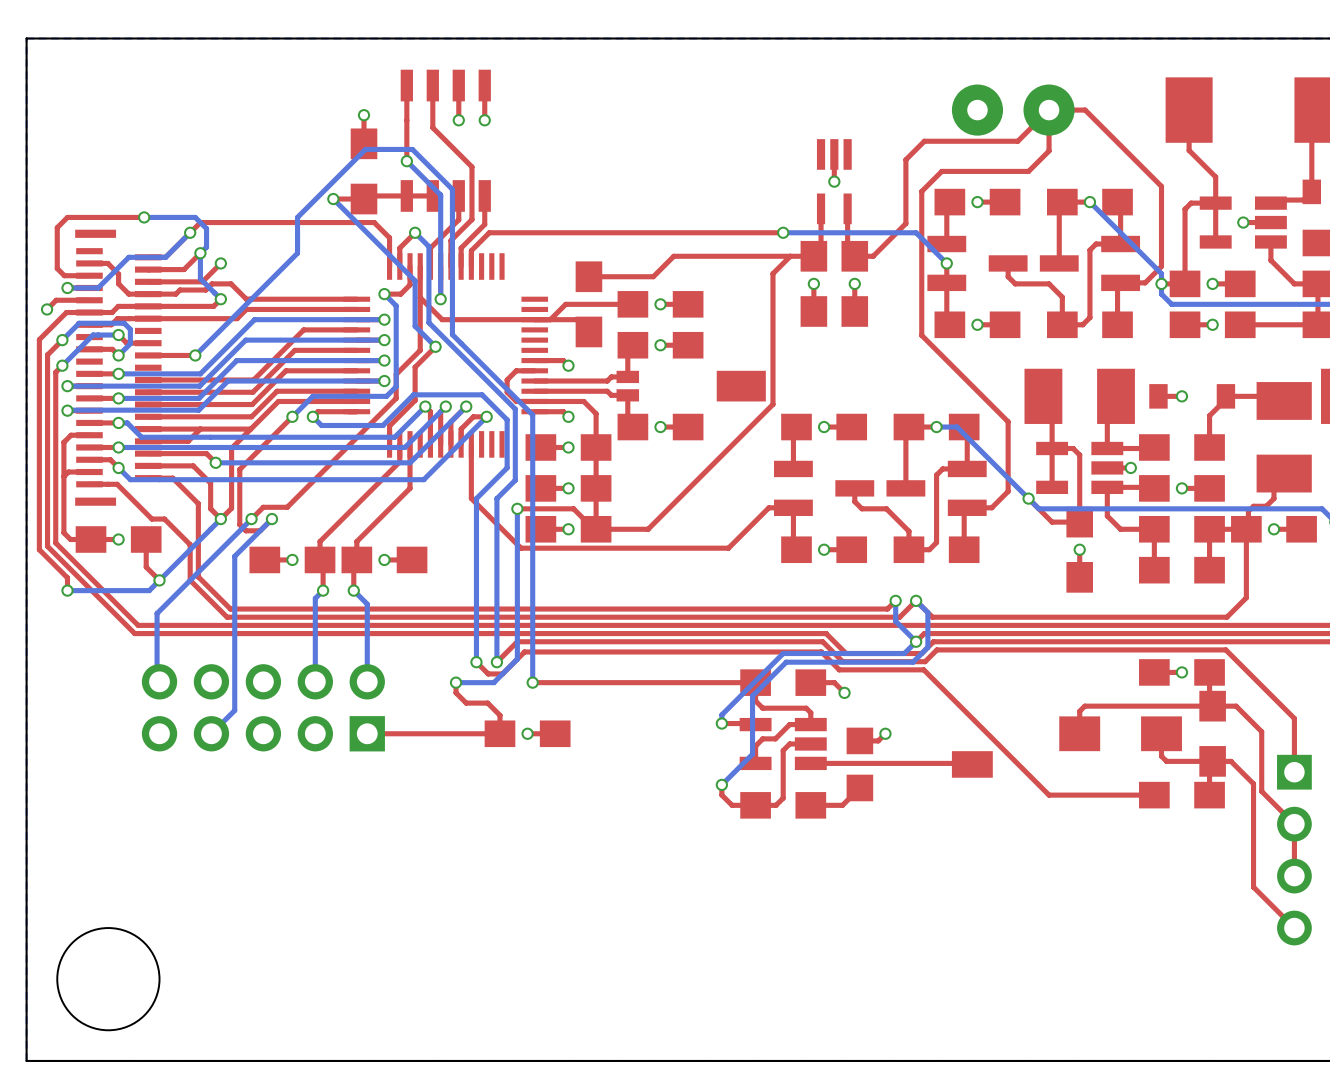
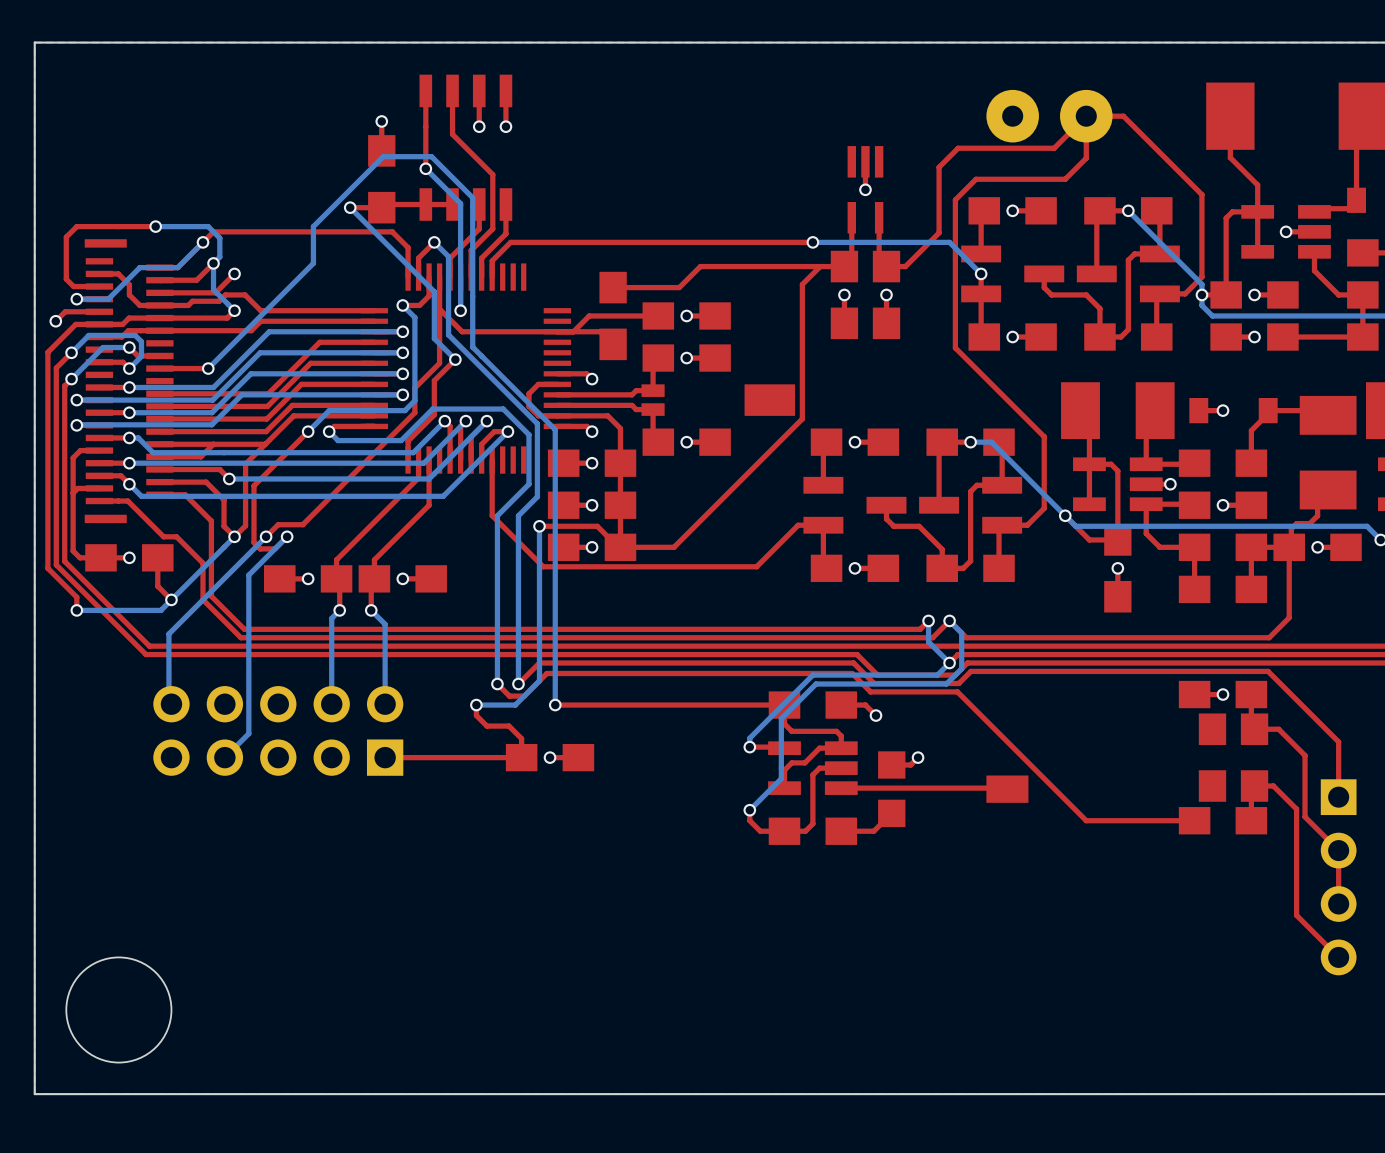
top track: (1212, 706) (1084, 706) (1079, 711) (1079, 733) -> none
part: (1120, 733) -> none
top track: (1161, 733) (1161, 756) (1166, 761) (1212, 761) -> none
part: none -> (1212, 757)

